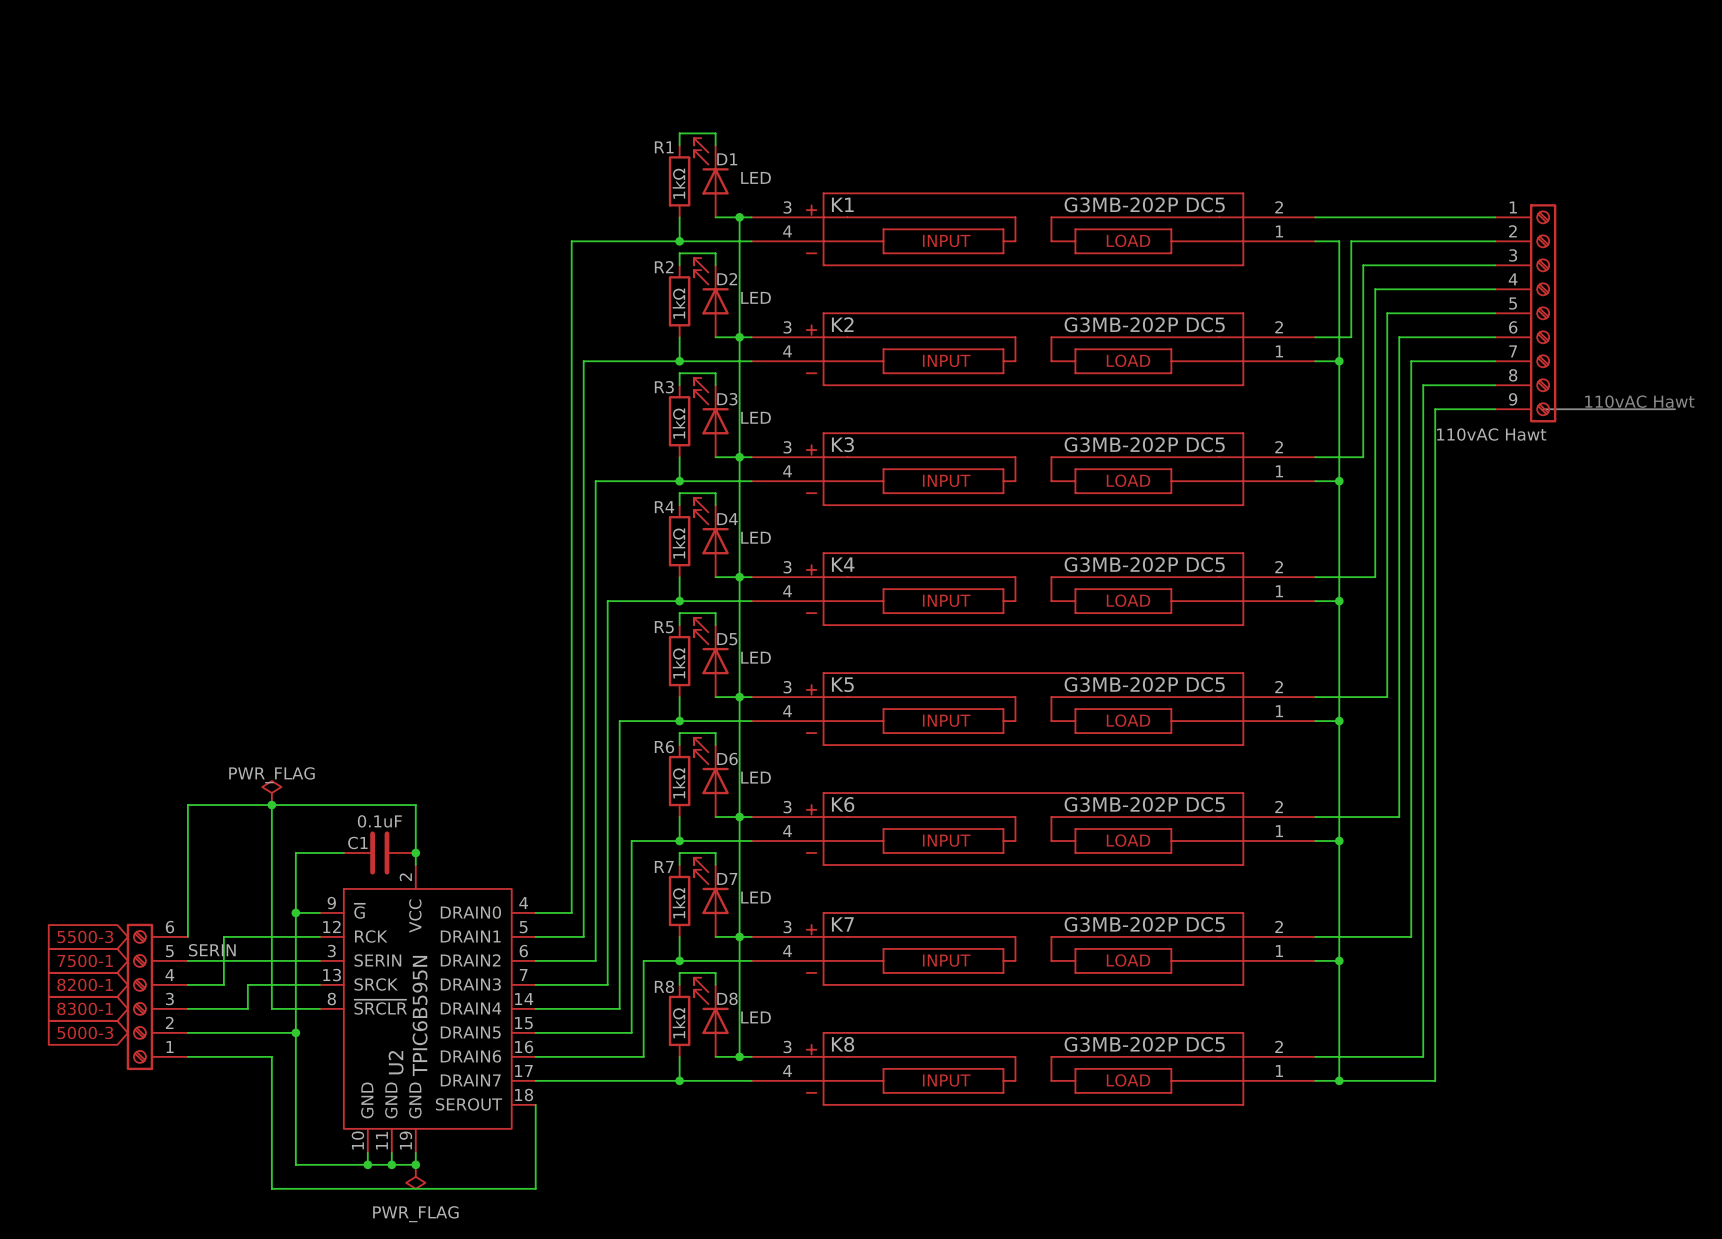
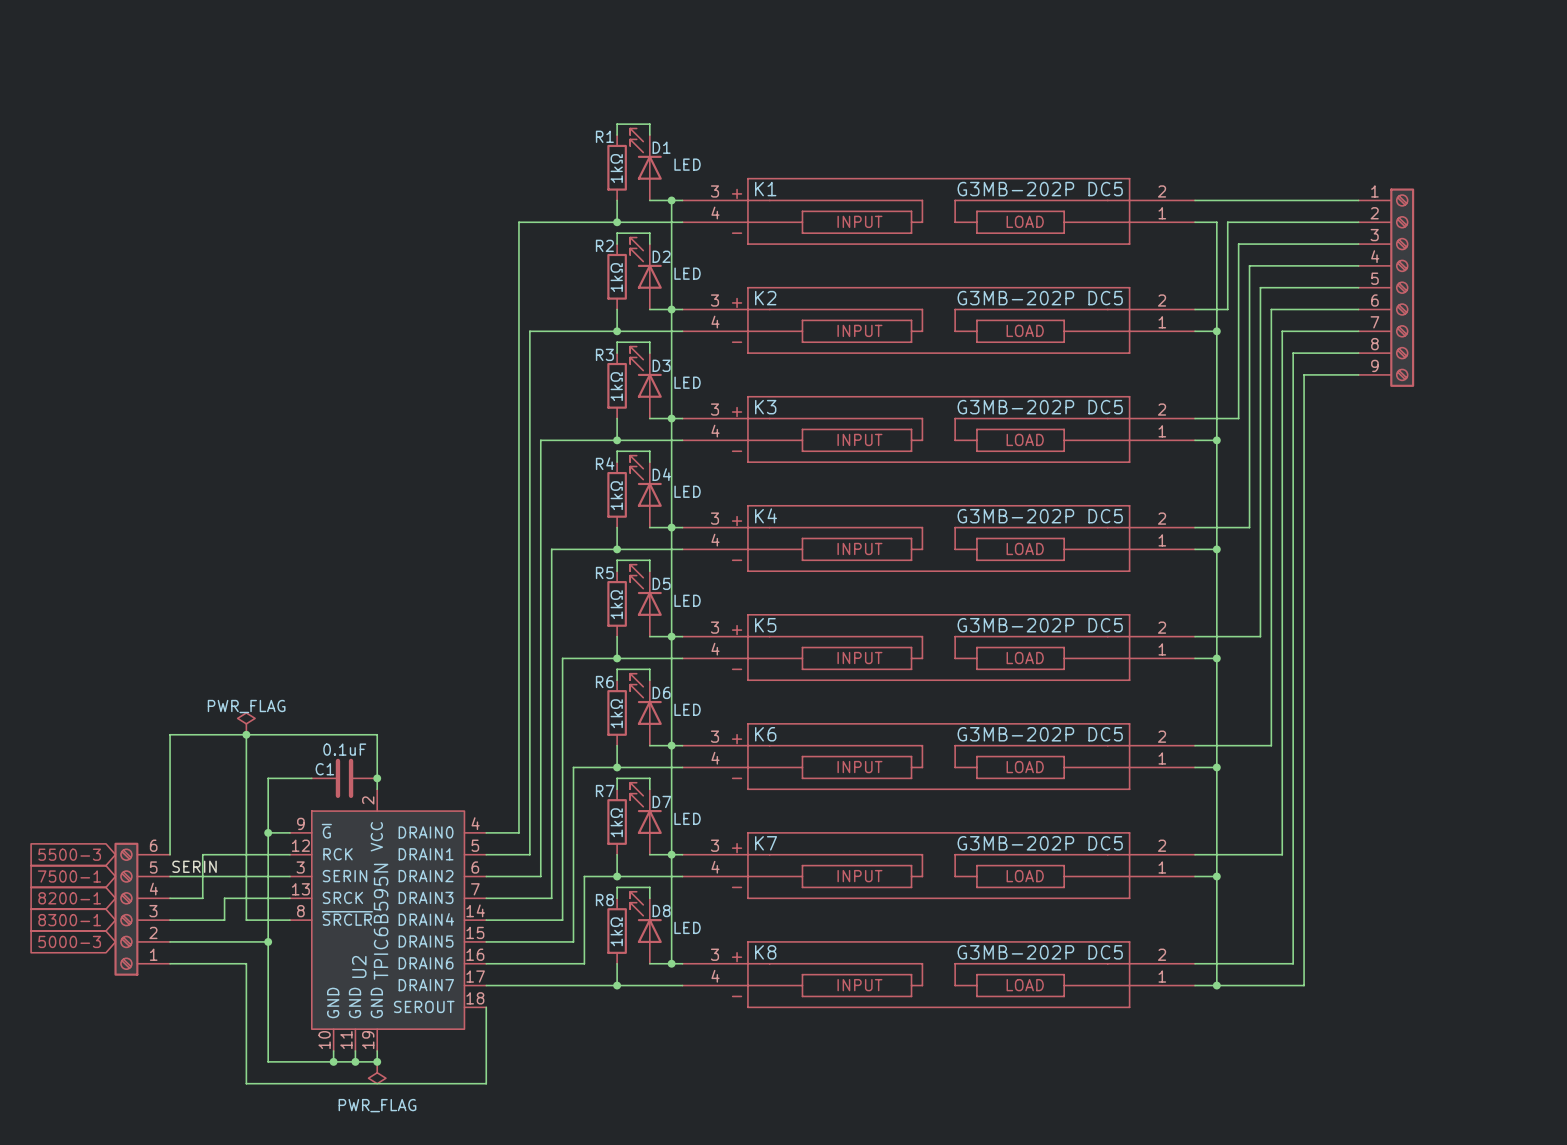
text: 110vAC Hawt (1639, 401) -> none
line: (1543, 409) (1675, 409) -> none
label: 110vAC Hawt (1491, 434) -> none

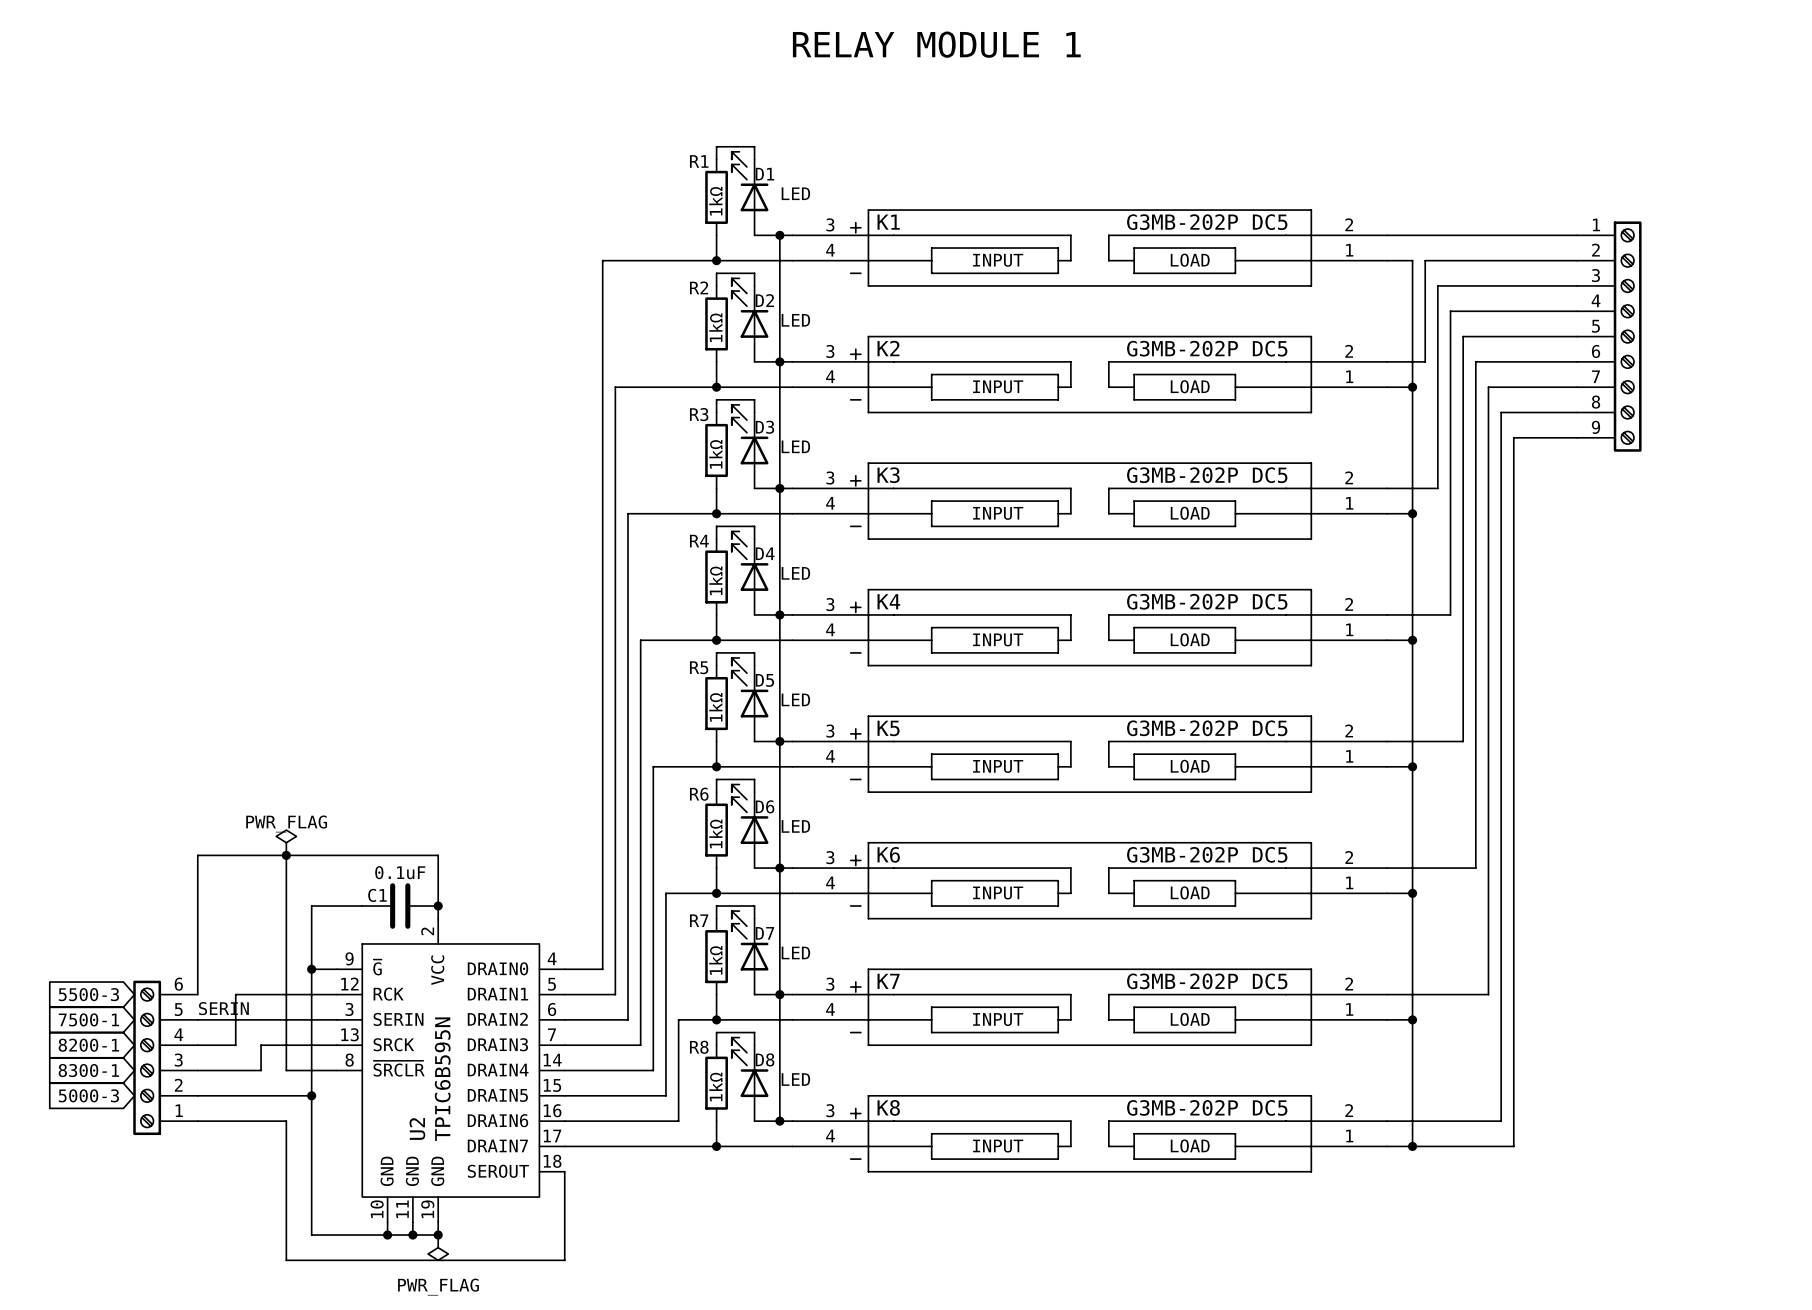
text: none -> RELAY MODULE 1 (936, 44)

